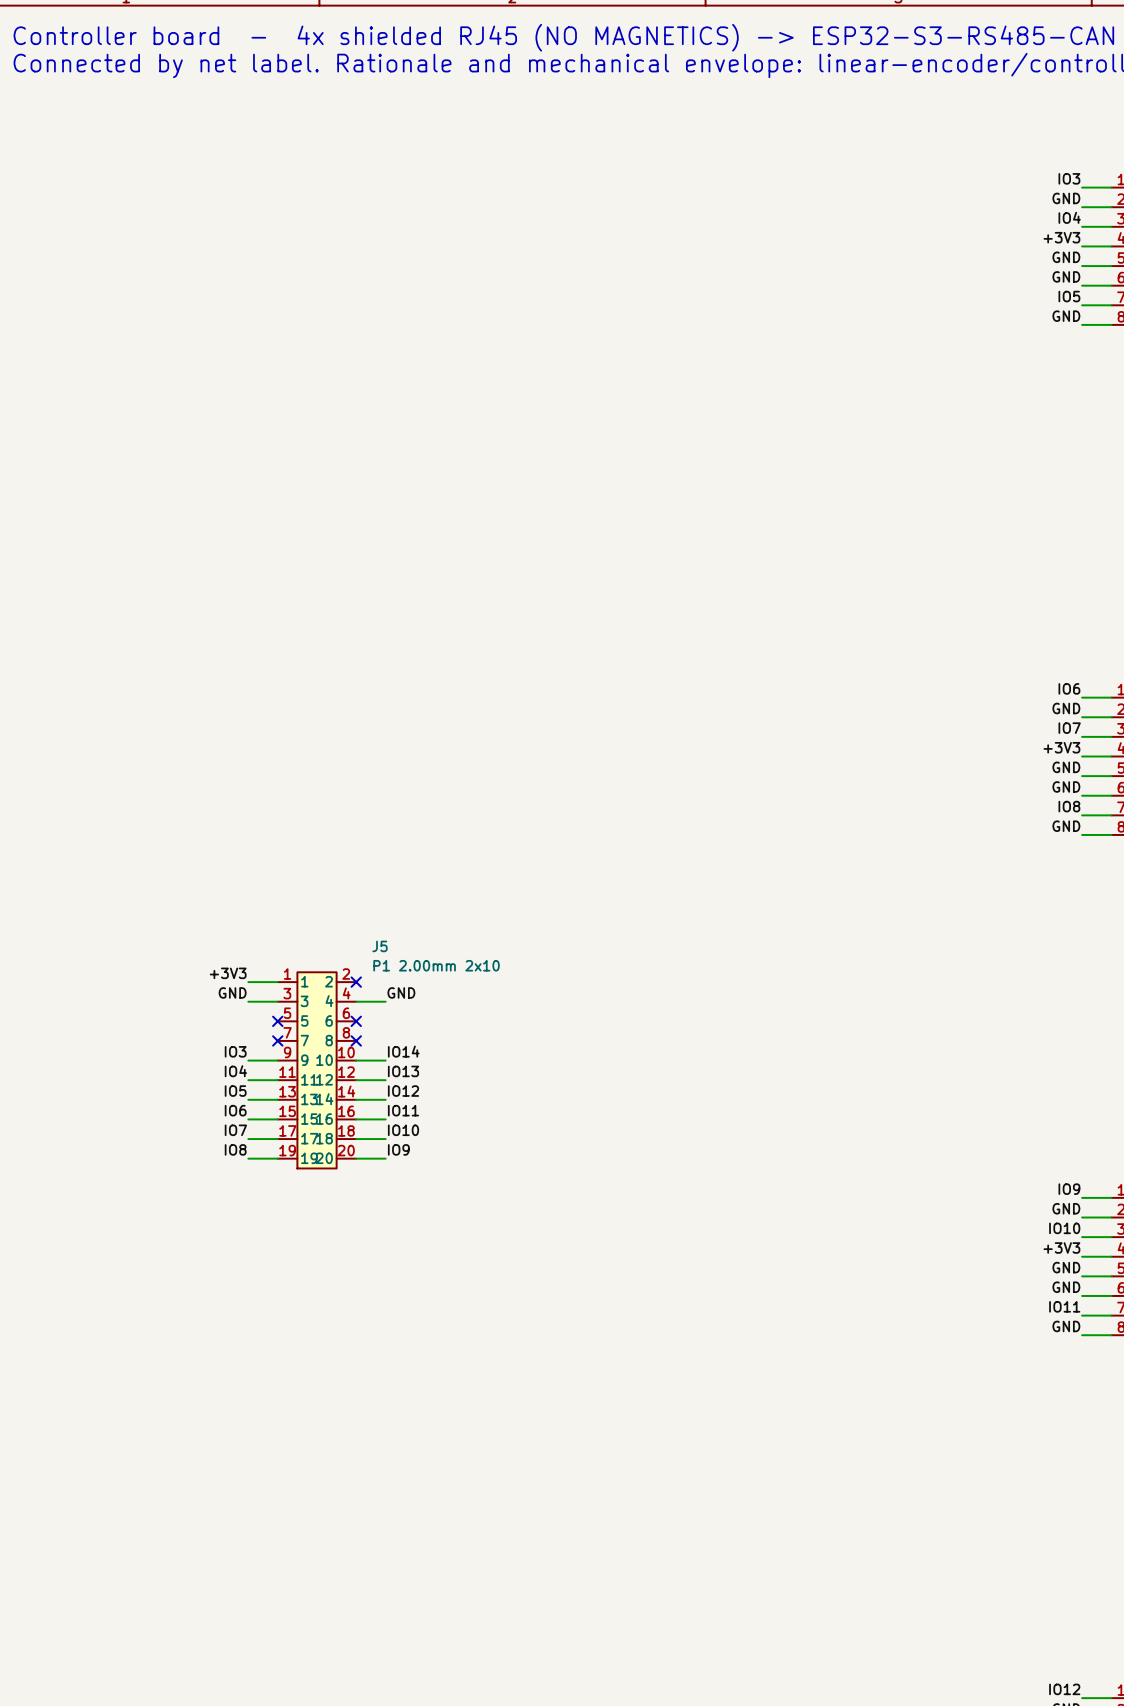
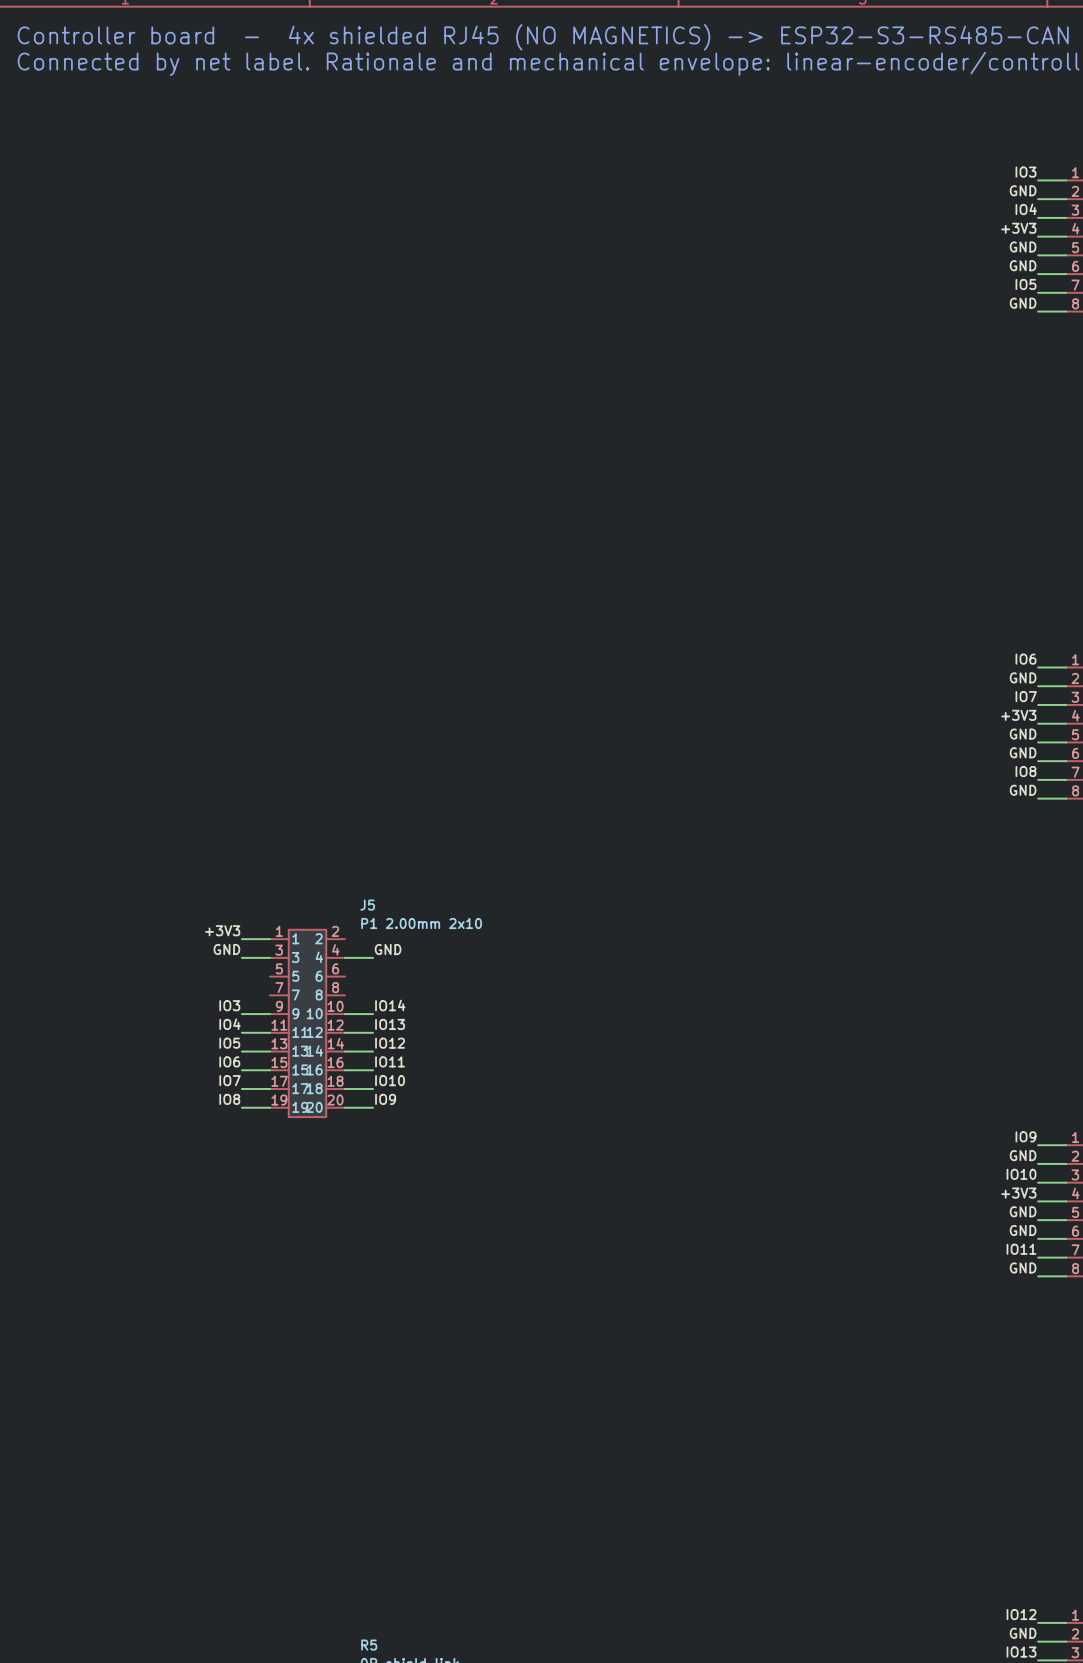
no-connect mark: (356, 982) -> none
no-connect mark: (277, 1021) -> none
no-connect mark: (356, 1021) -> none
no-connect mark: (277, 1040) -> none
no-connect mark: (356, 1040) -> none

